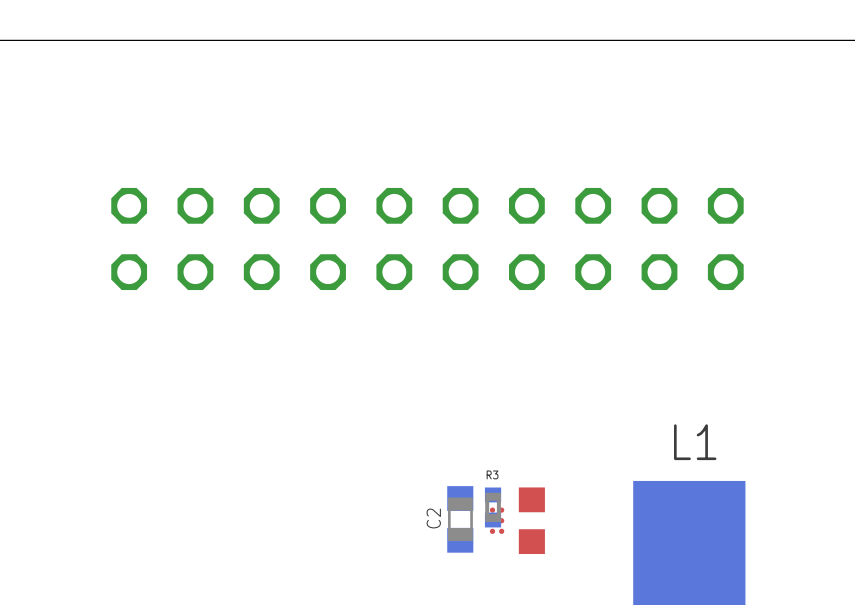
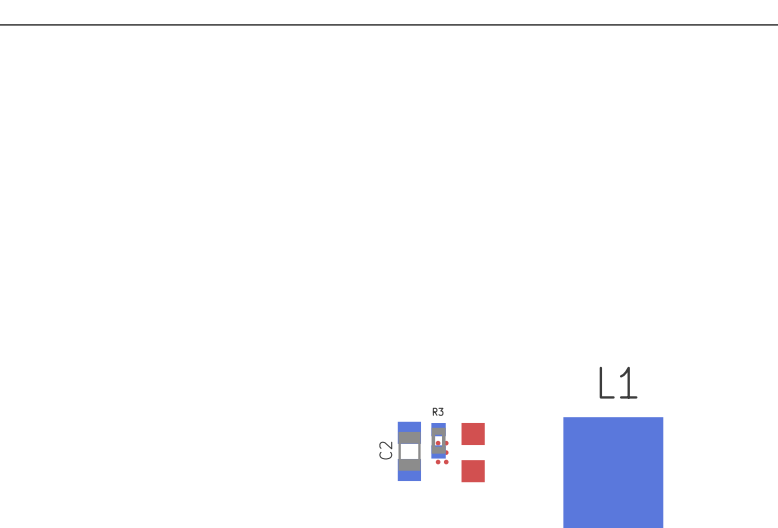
part: (427, 238) -> none

